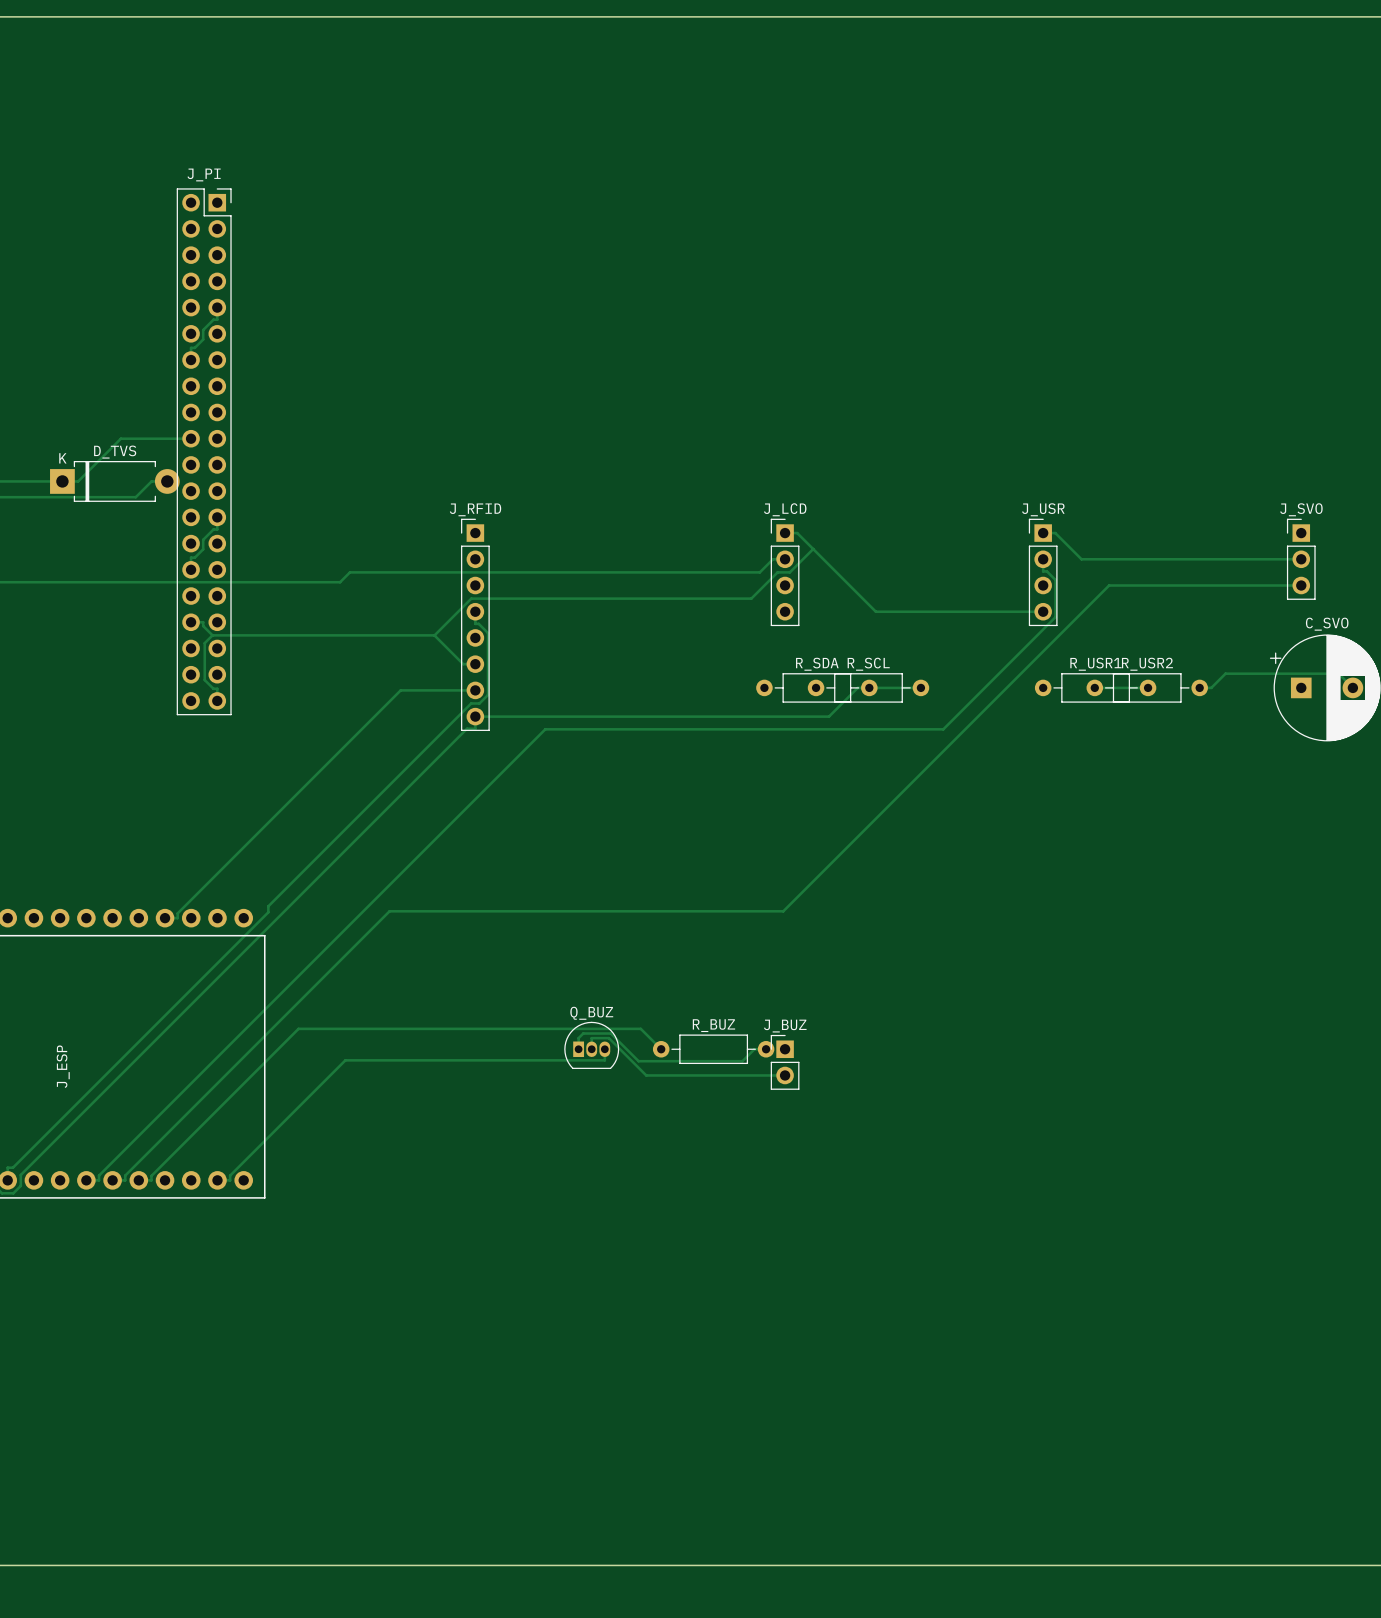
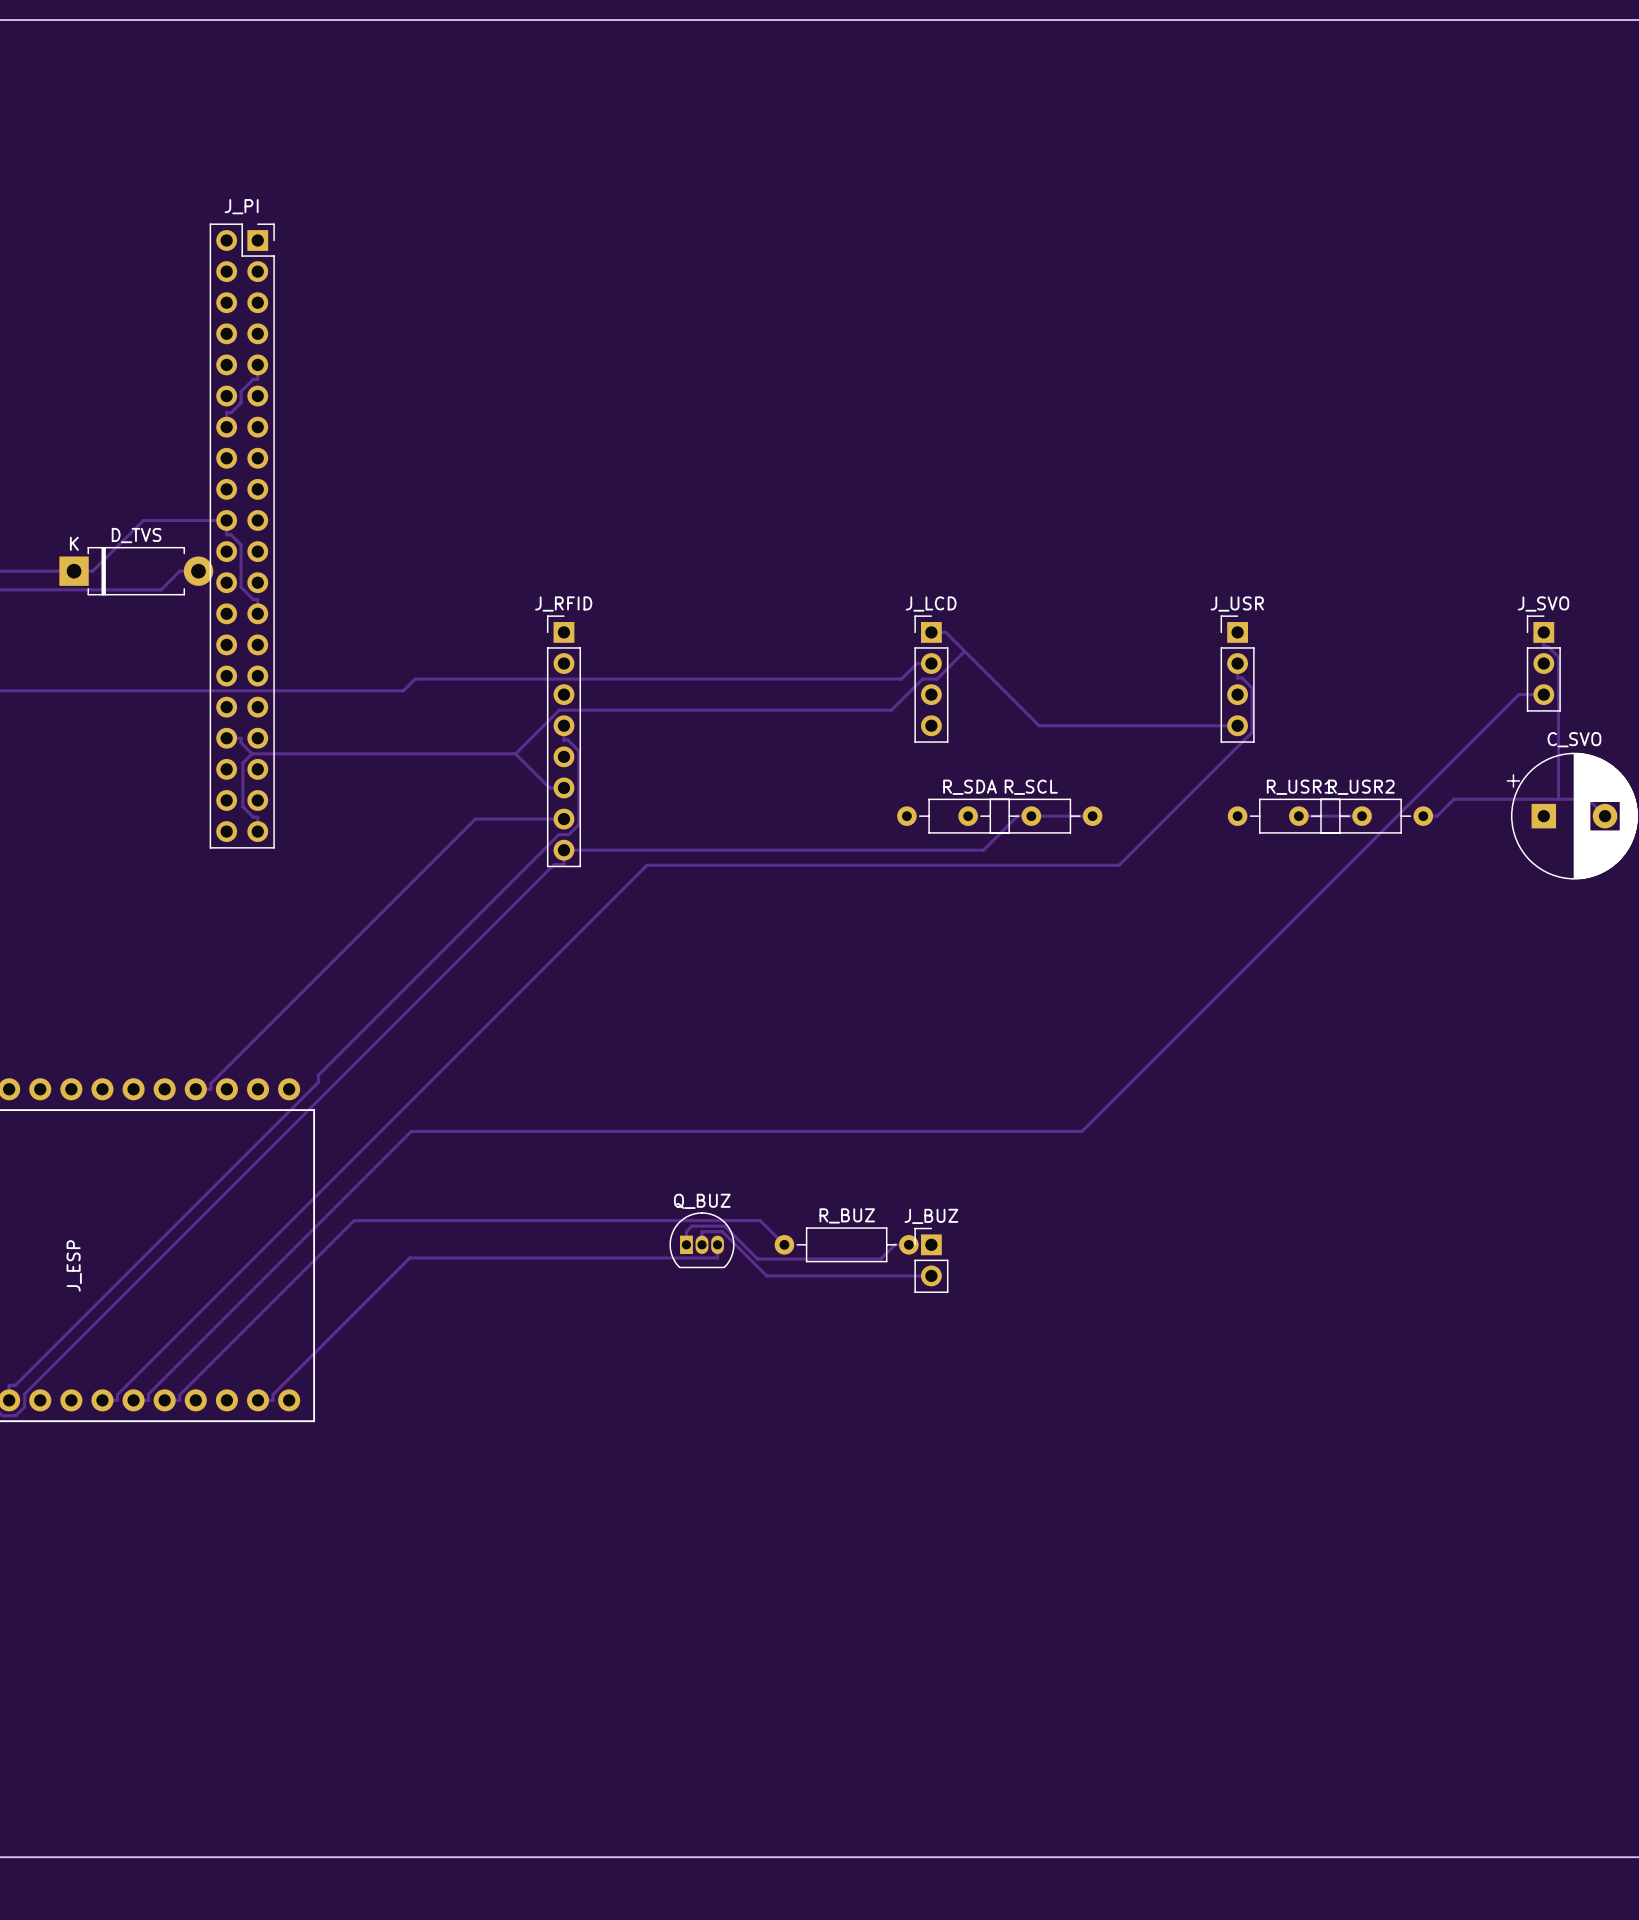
track: (217, 517) (217, 529) (213, 529) (203, 539) (203, 549) (194, 557) (191, 557) (191, 569) -> (257, 613) (257, 599) (253, 599) (241, 587) (241, 544) (231, 534) (226, 534) (226, 520)
track: (1043, 533) (1055, 533) (1081, 559) (1301, 559) -> none
track: none -> (1543, 632) (1543, 646) (1548, 646) (1558, 657) (1558, 799)
track: (1280, 585) (1109, 585) (783, 911) (389, 911) (125, 1175) -> (1518, 694) (1082, 1131) (411, 1131) (148, 1394)

